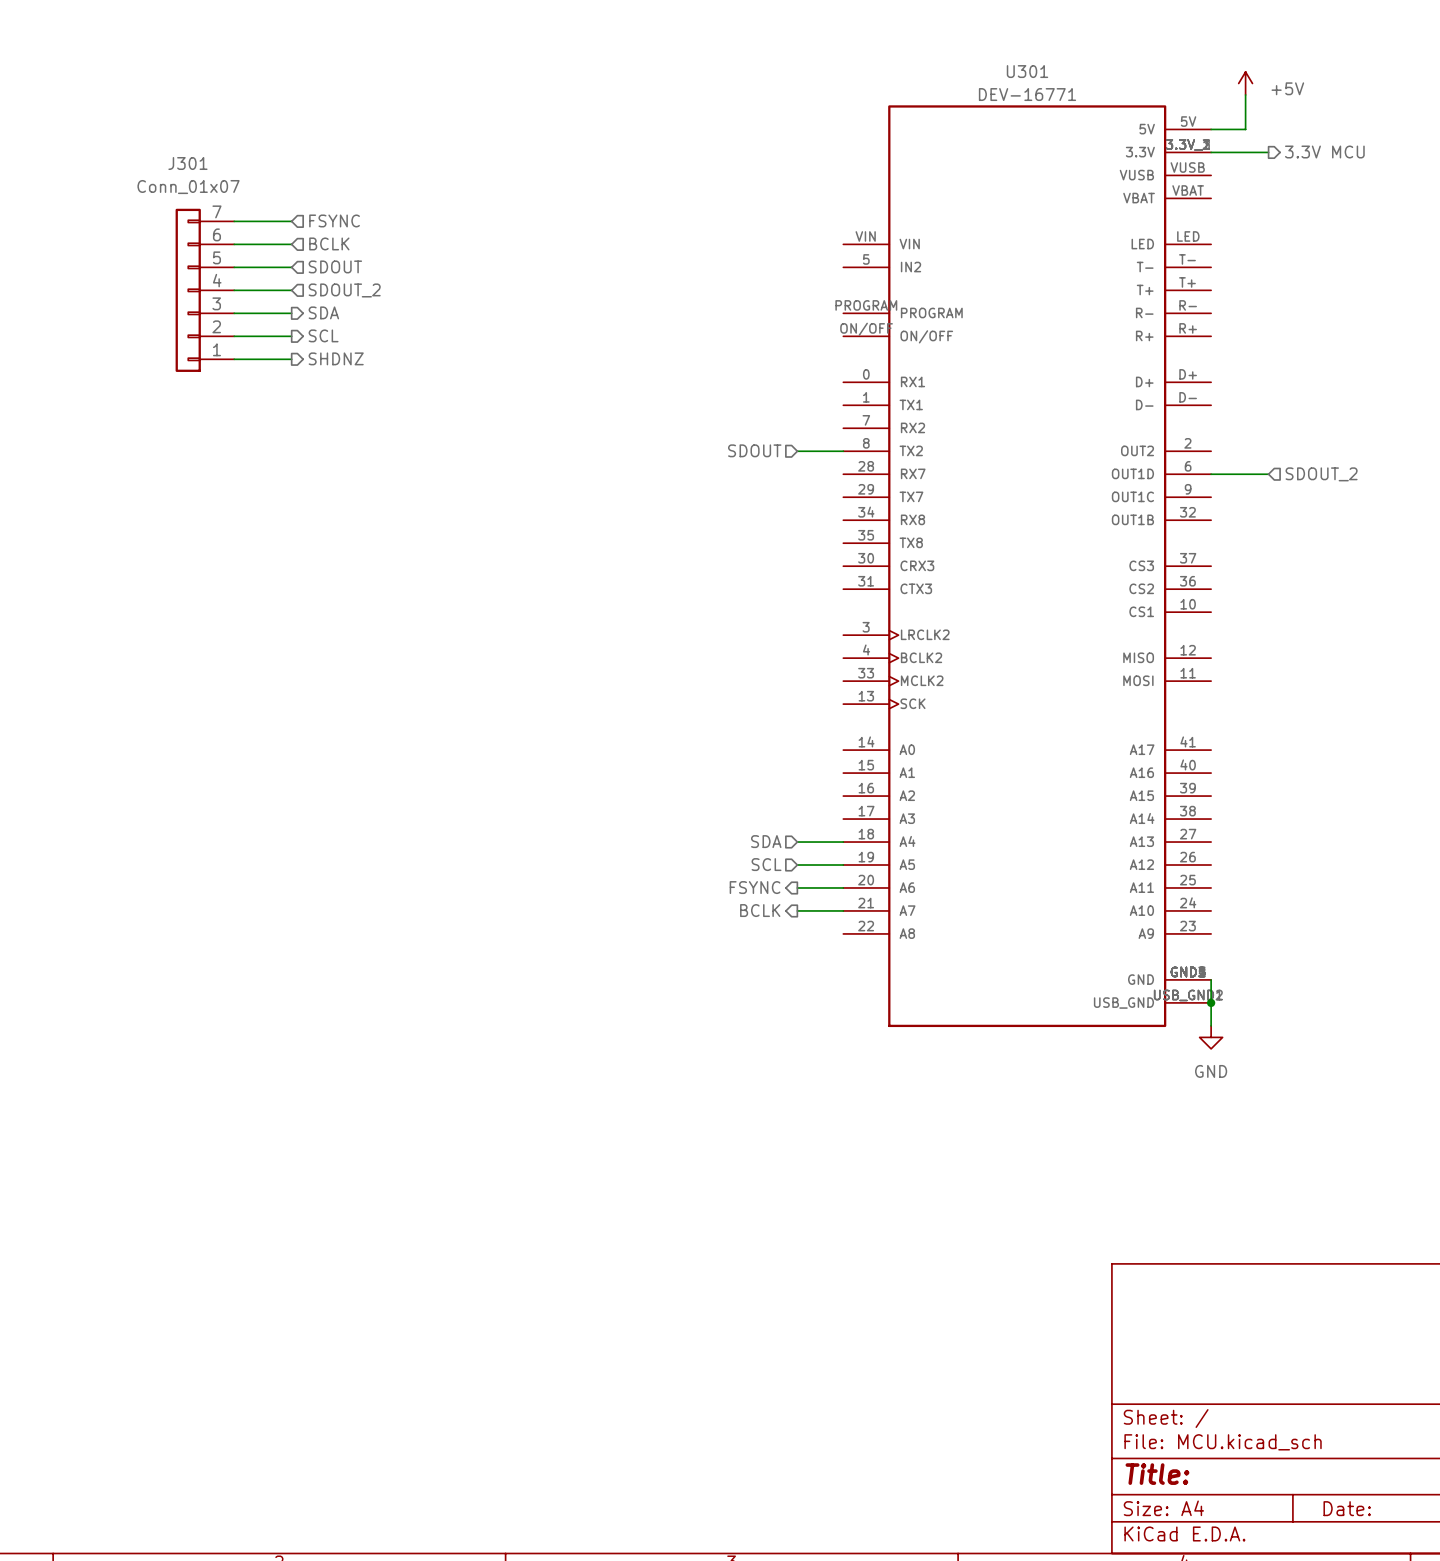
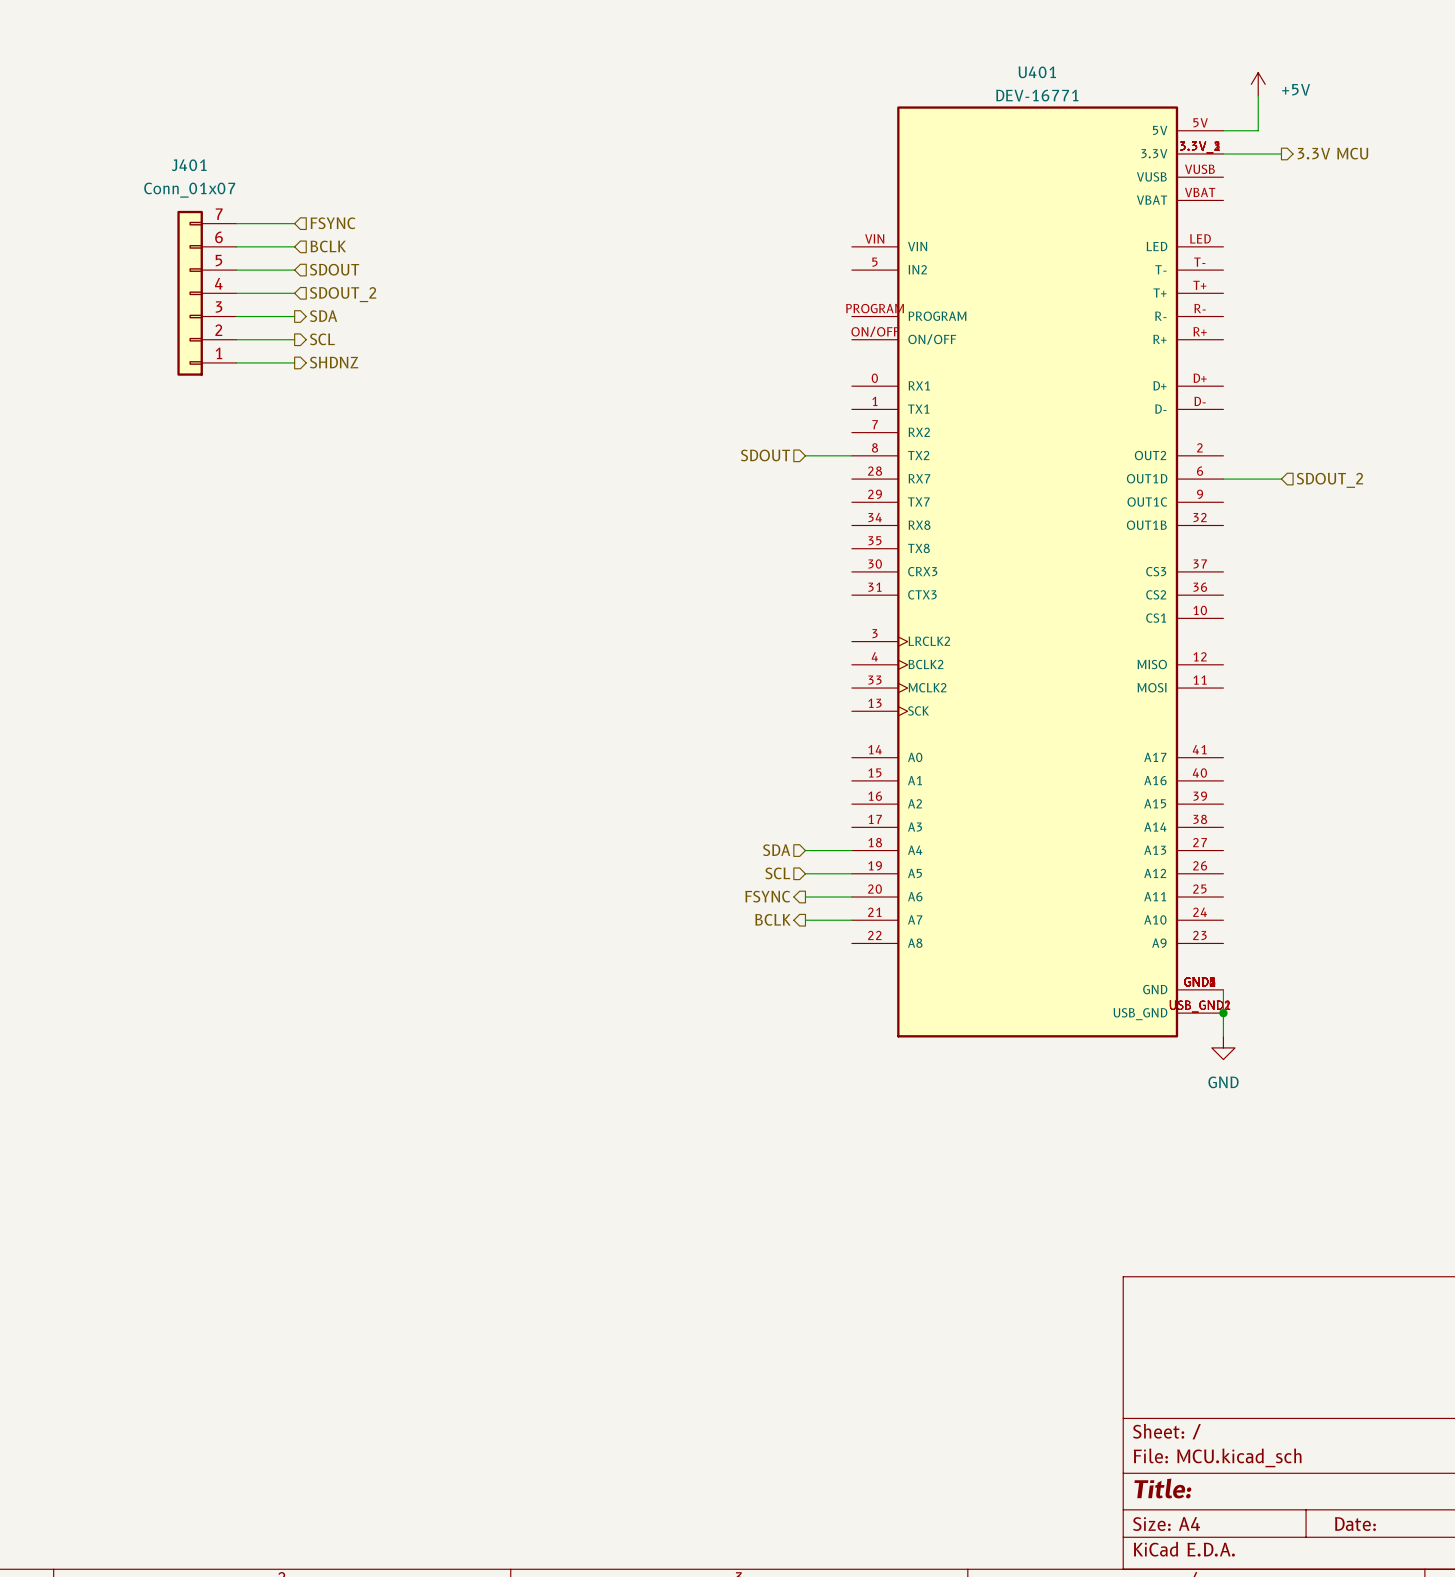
U301 name: U301 (1027, 71) -> U401 (1037, 72)
J301 name: J301 (187, 163) -> J401 (189, 165)

